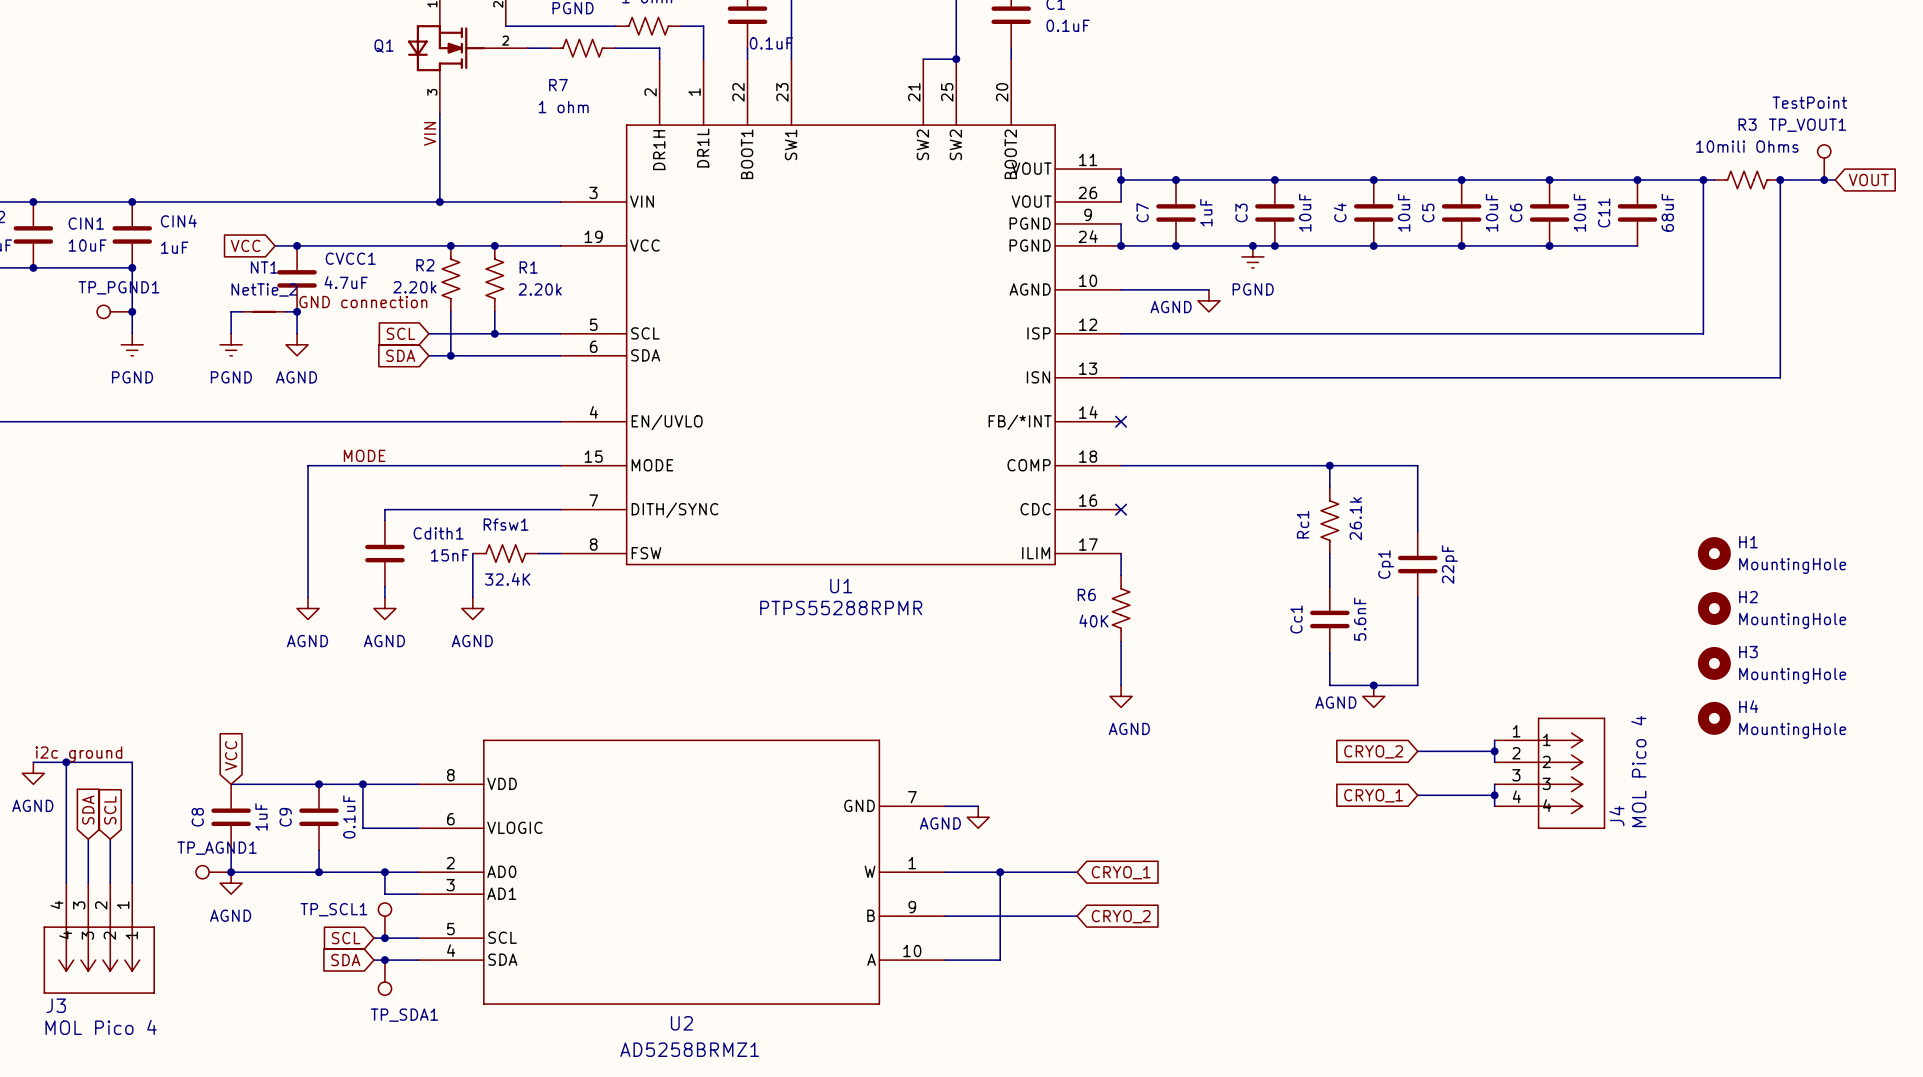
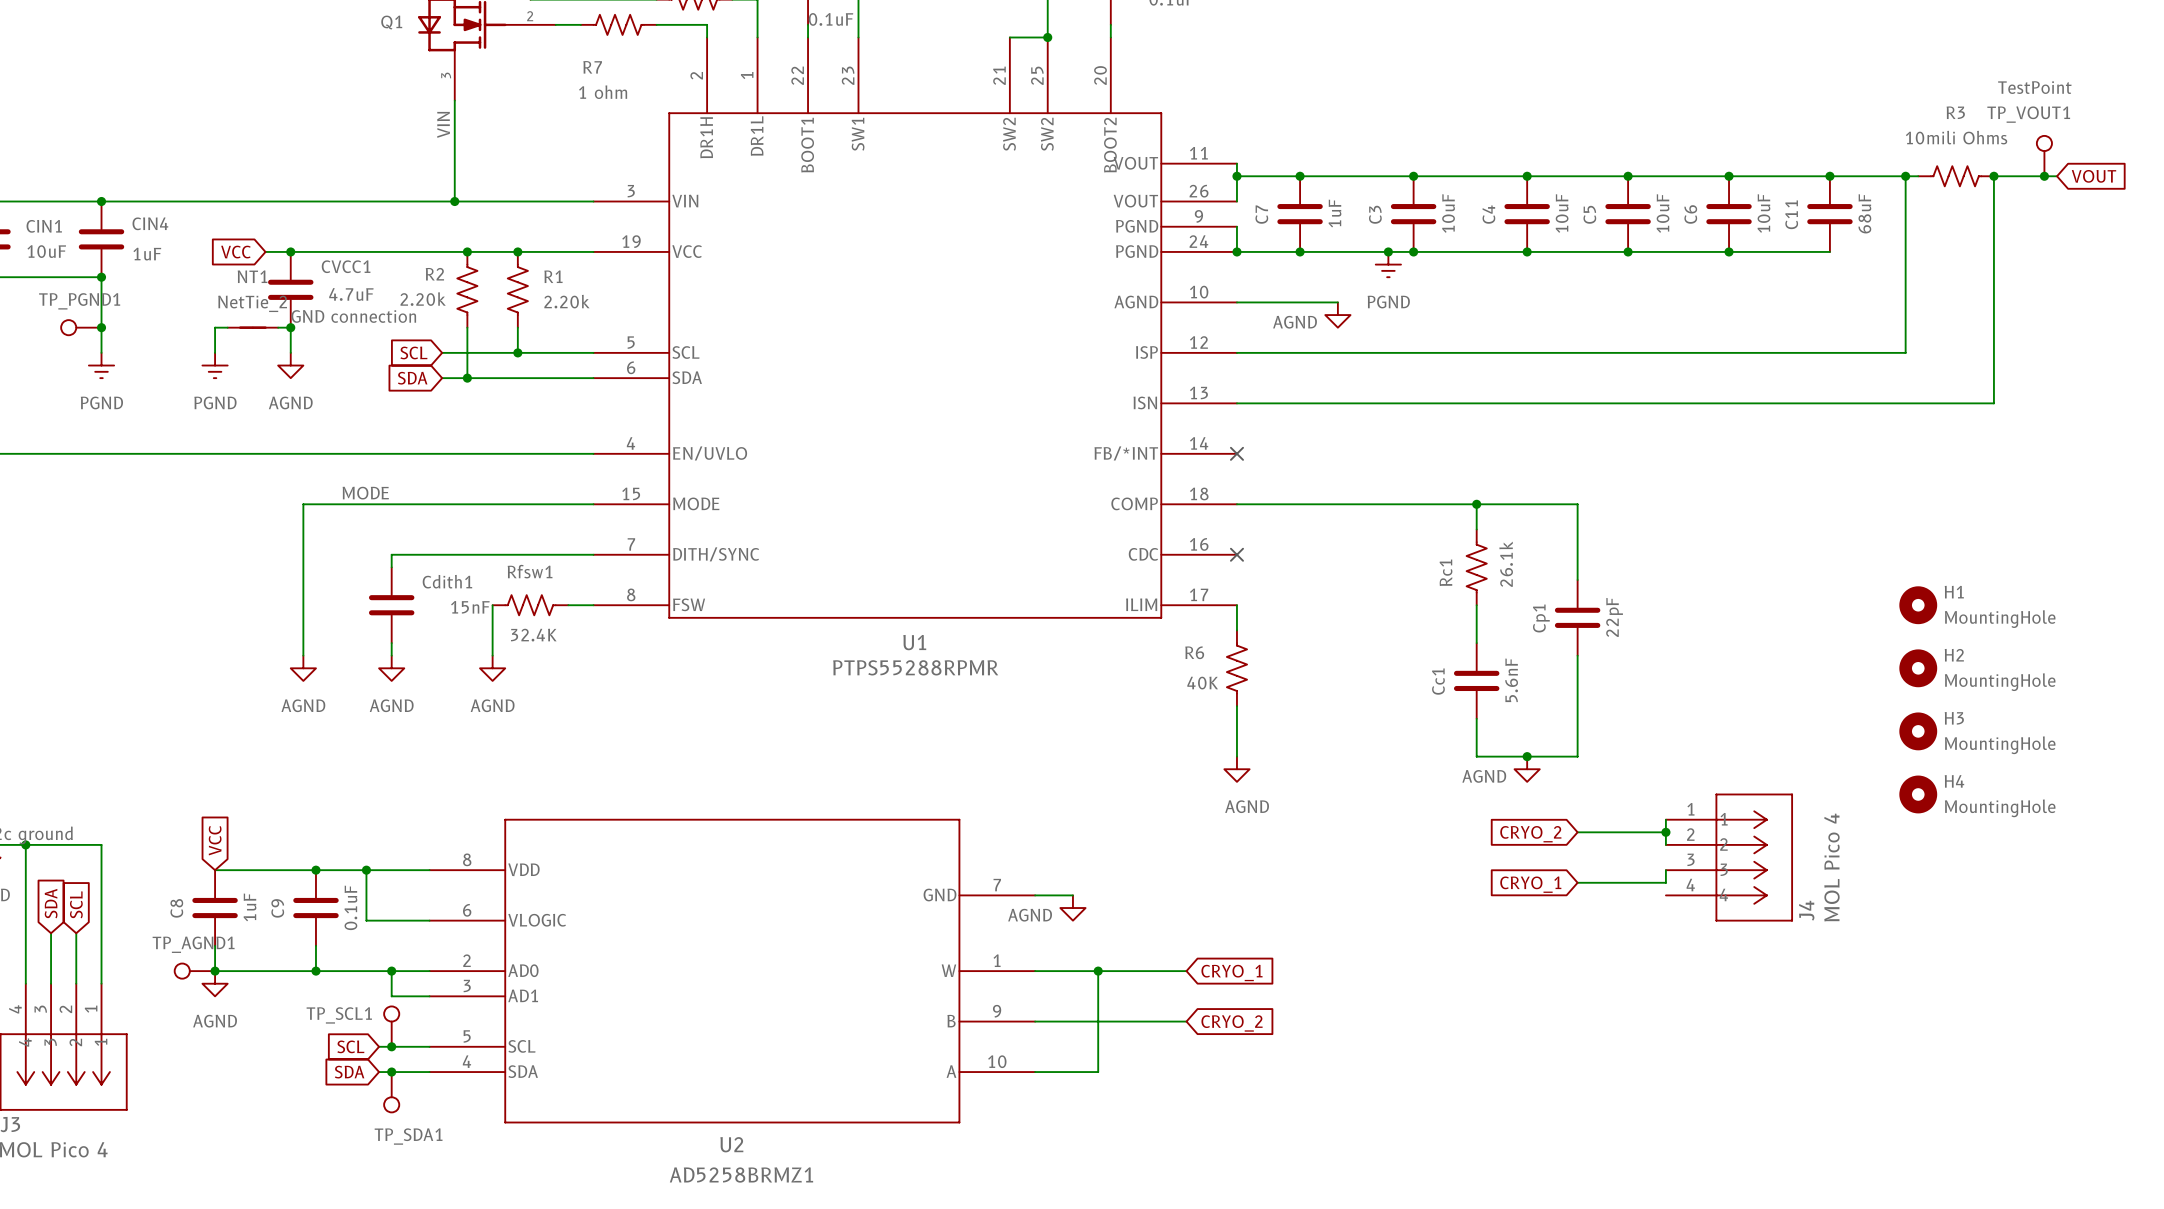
wire: (1494, 795) (1494, 806) -> none
junction: (1494, 795) -> none

